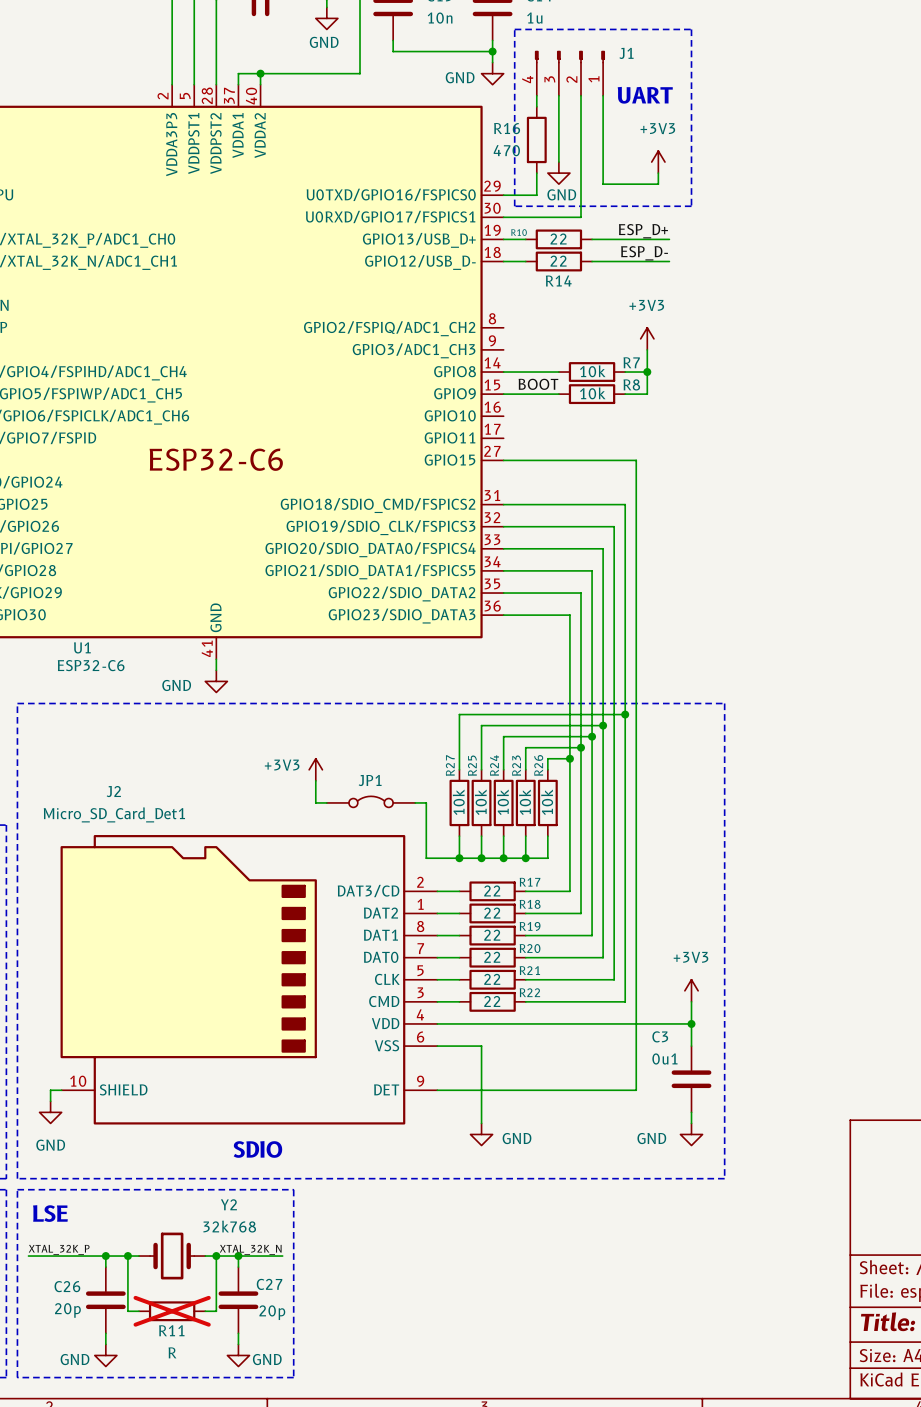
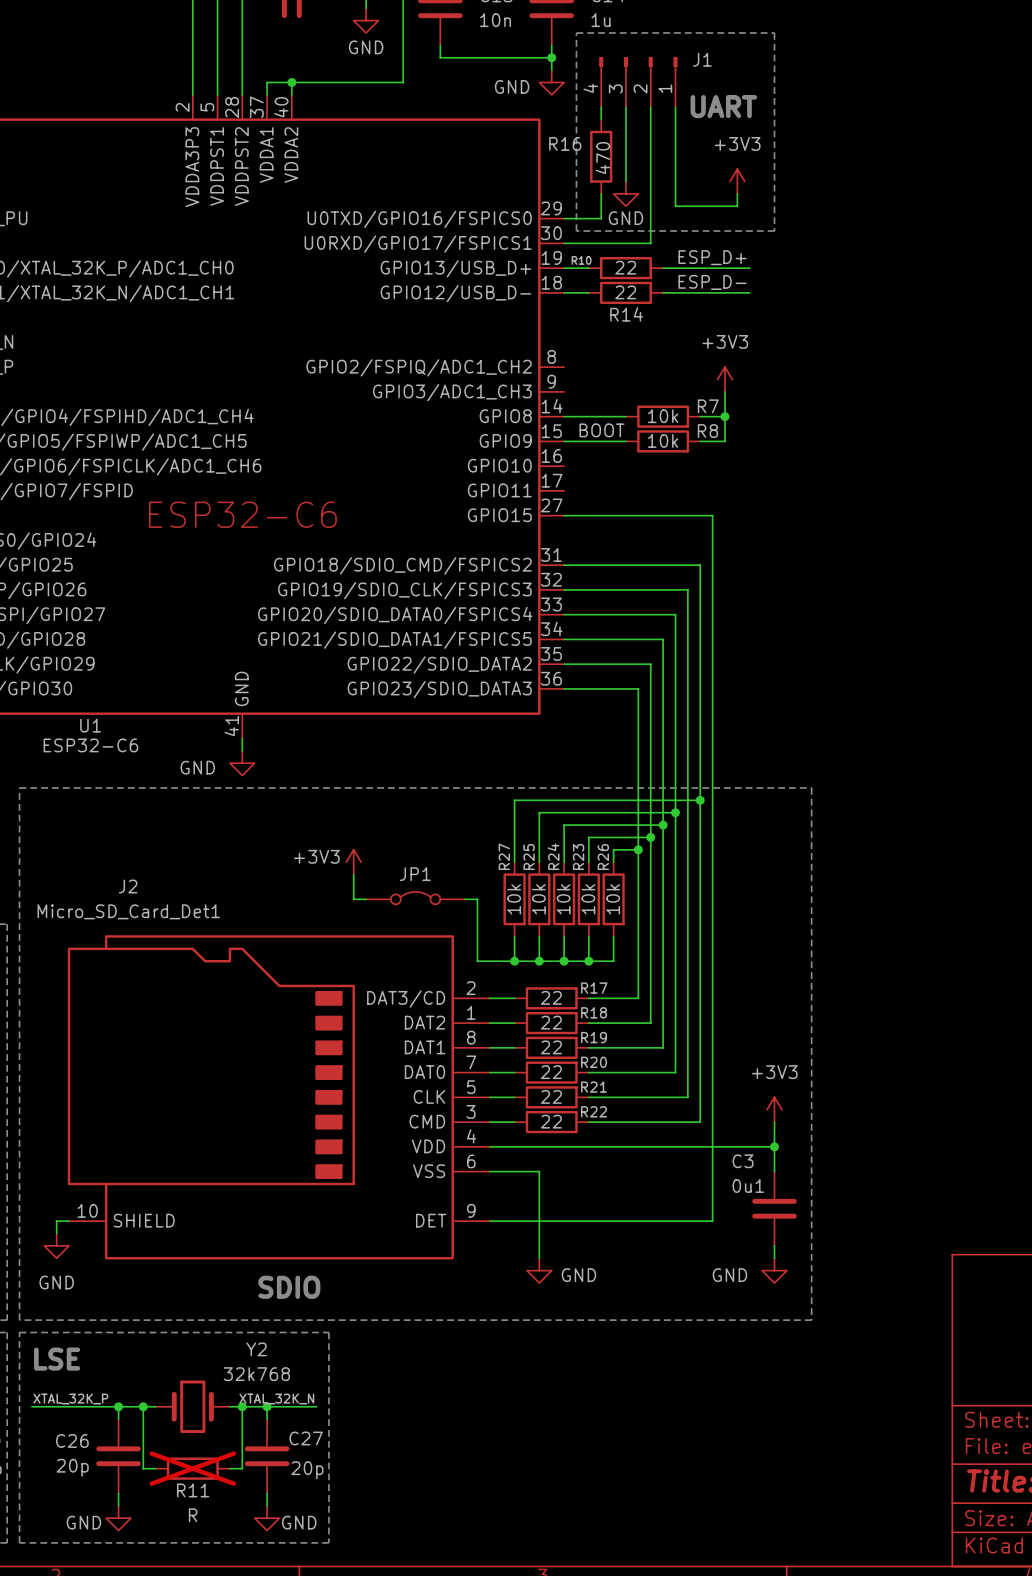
R16 value rotation: 0° (506, 150) -> 90° counterclockwise (602, 158)

